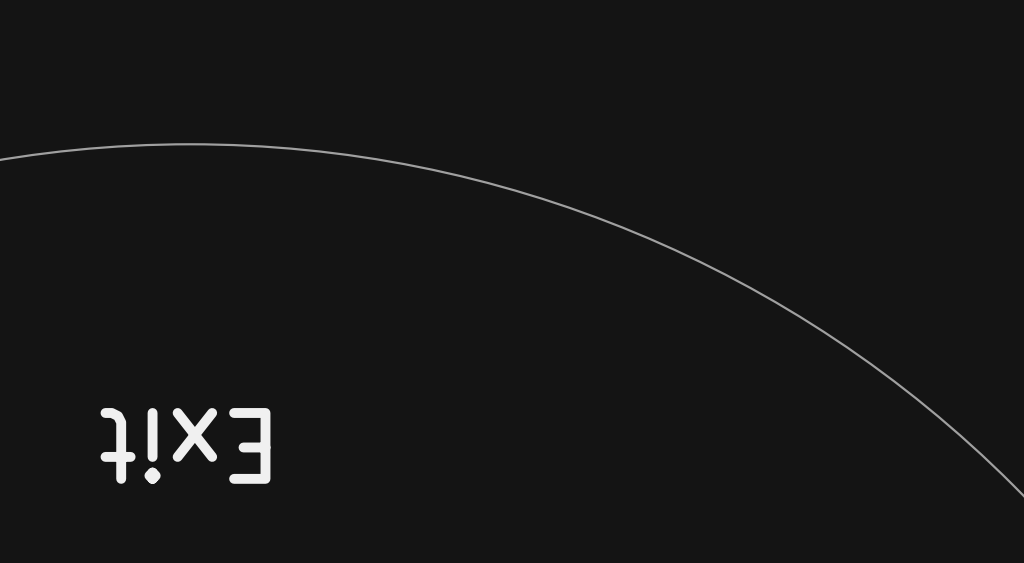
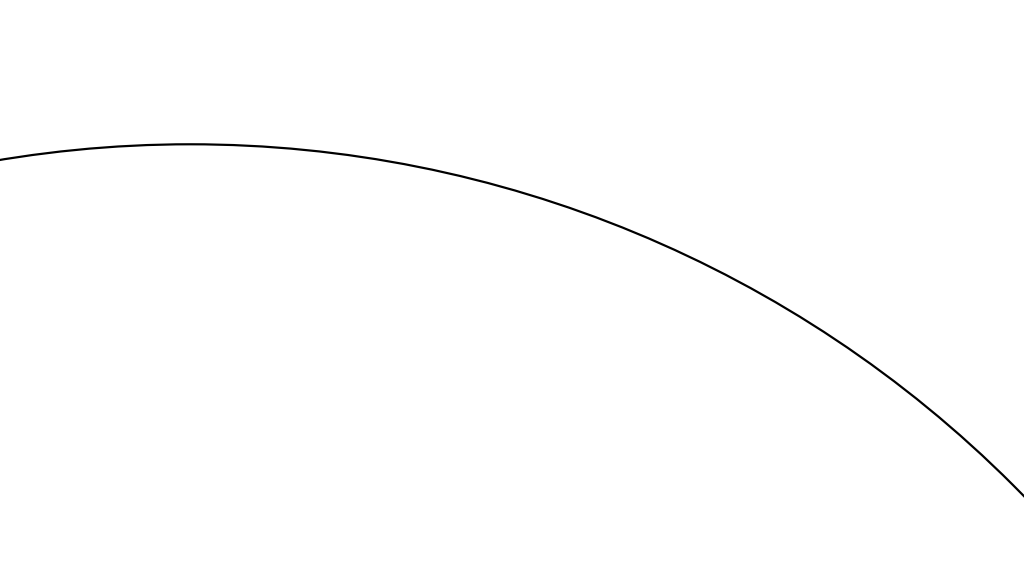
text: Exit (185, 445) -> none

